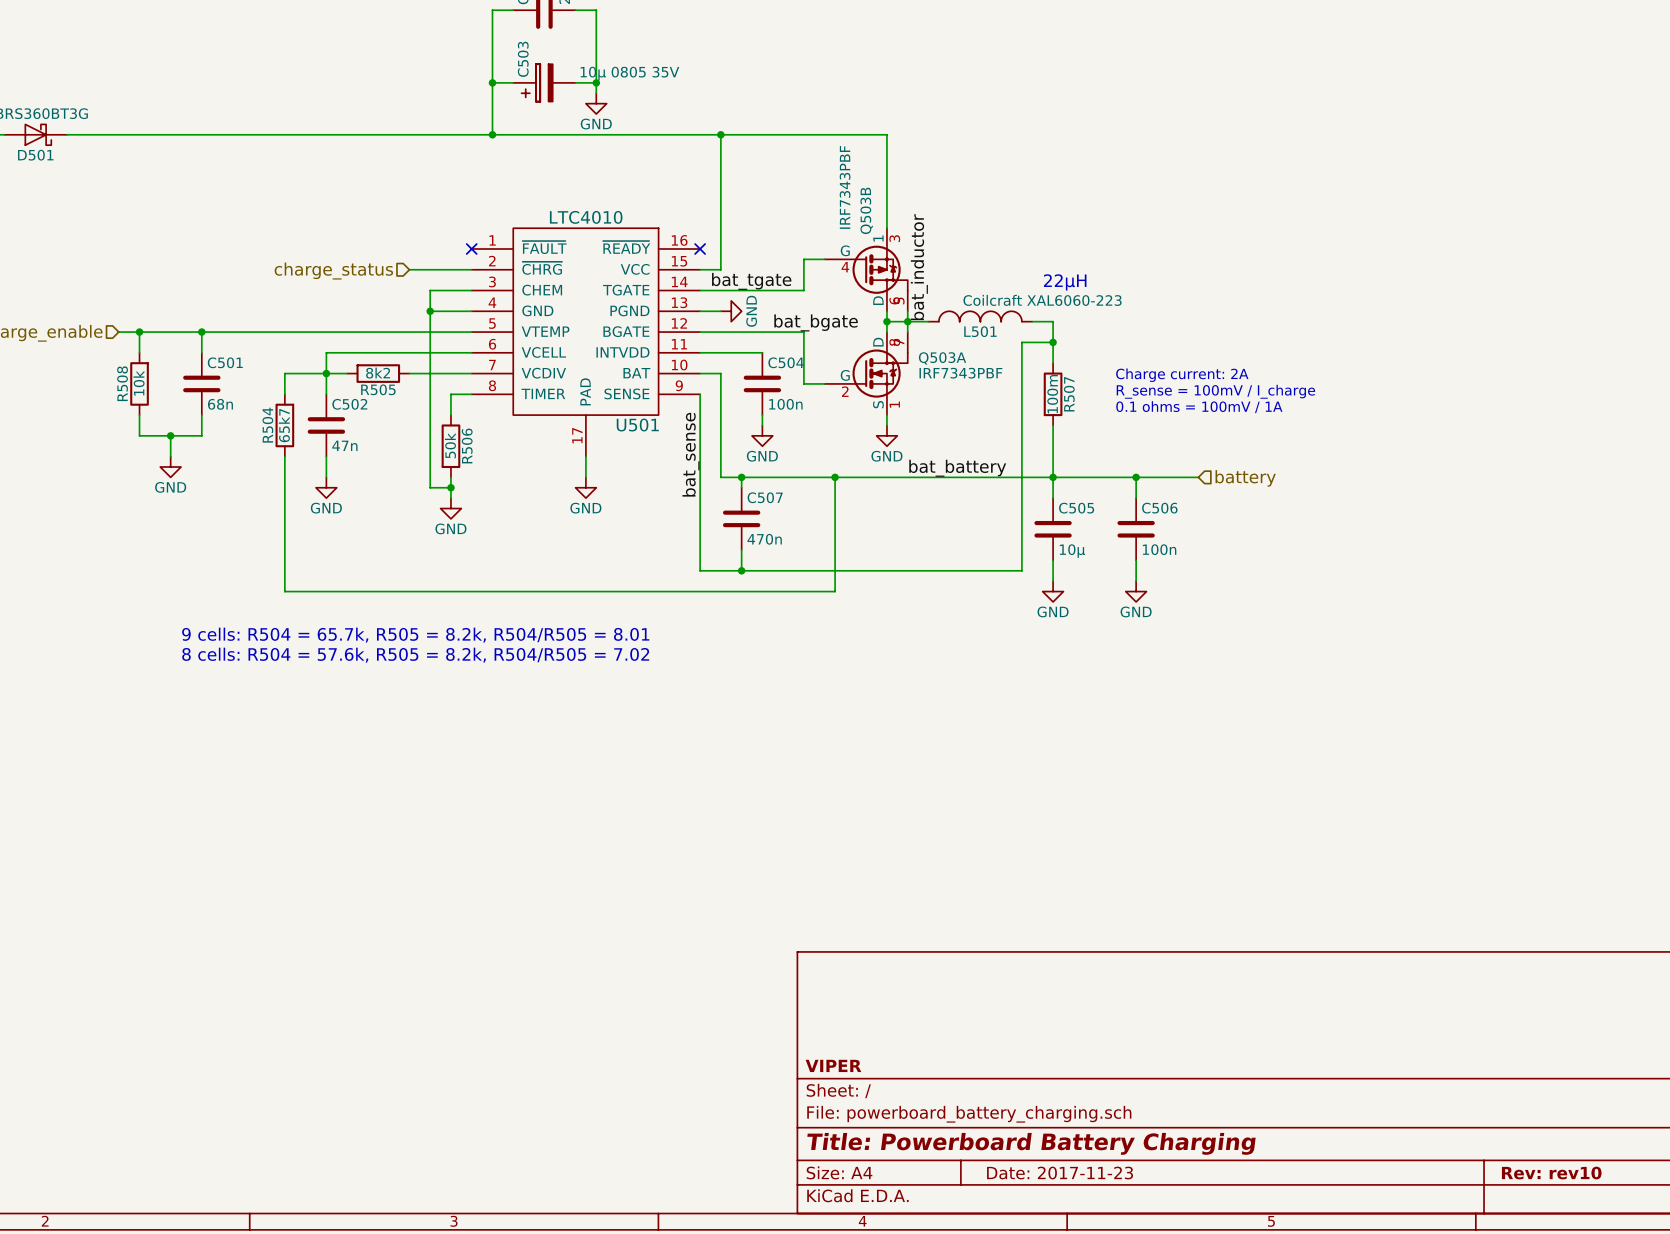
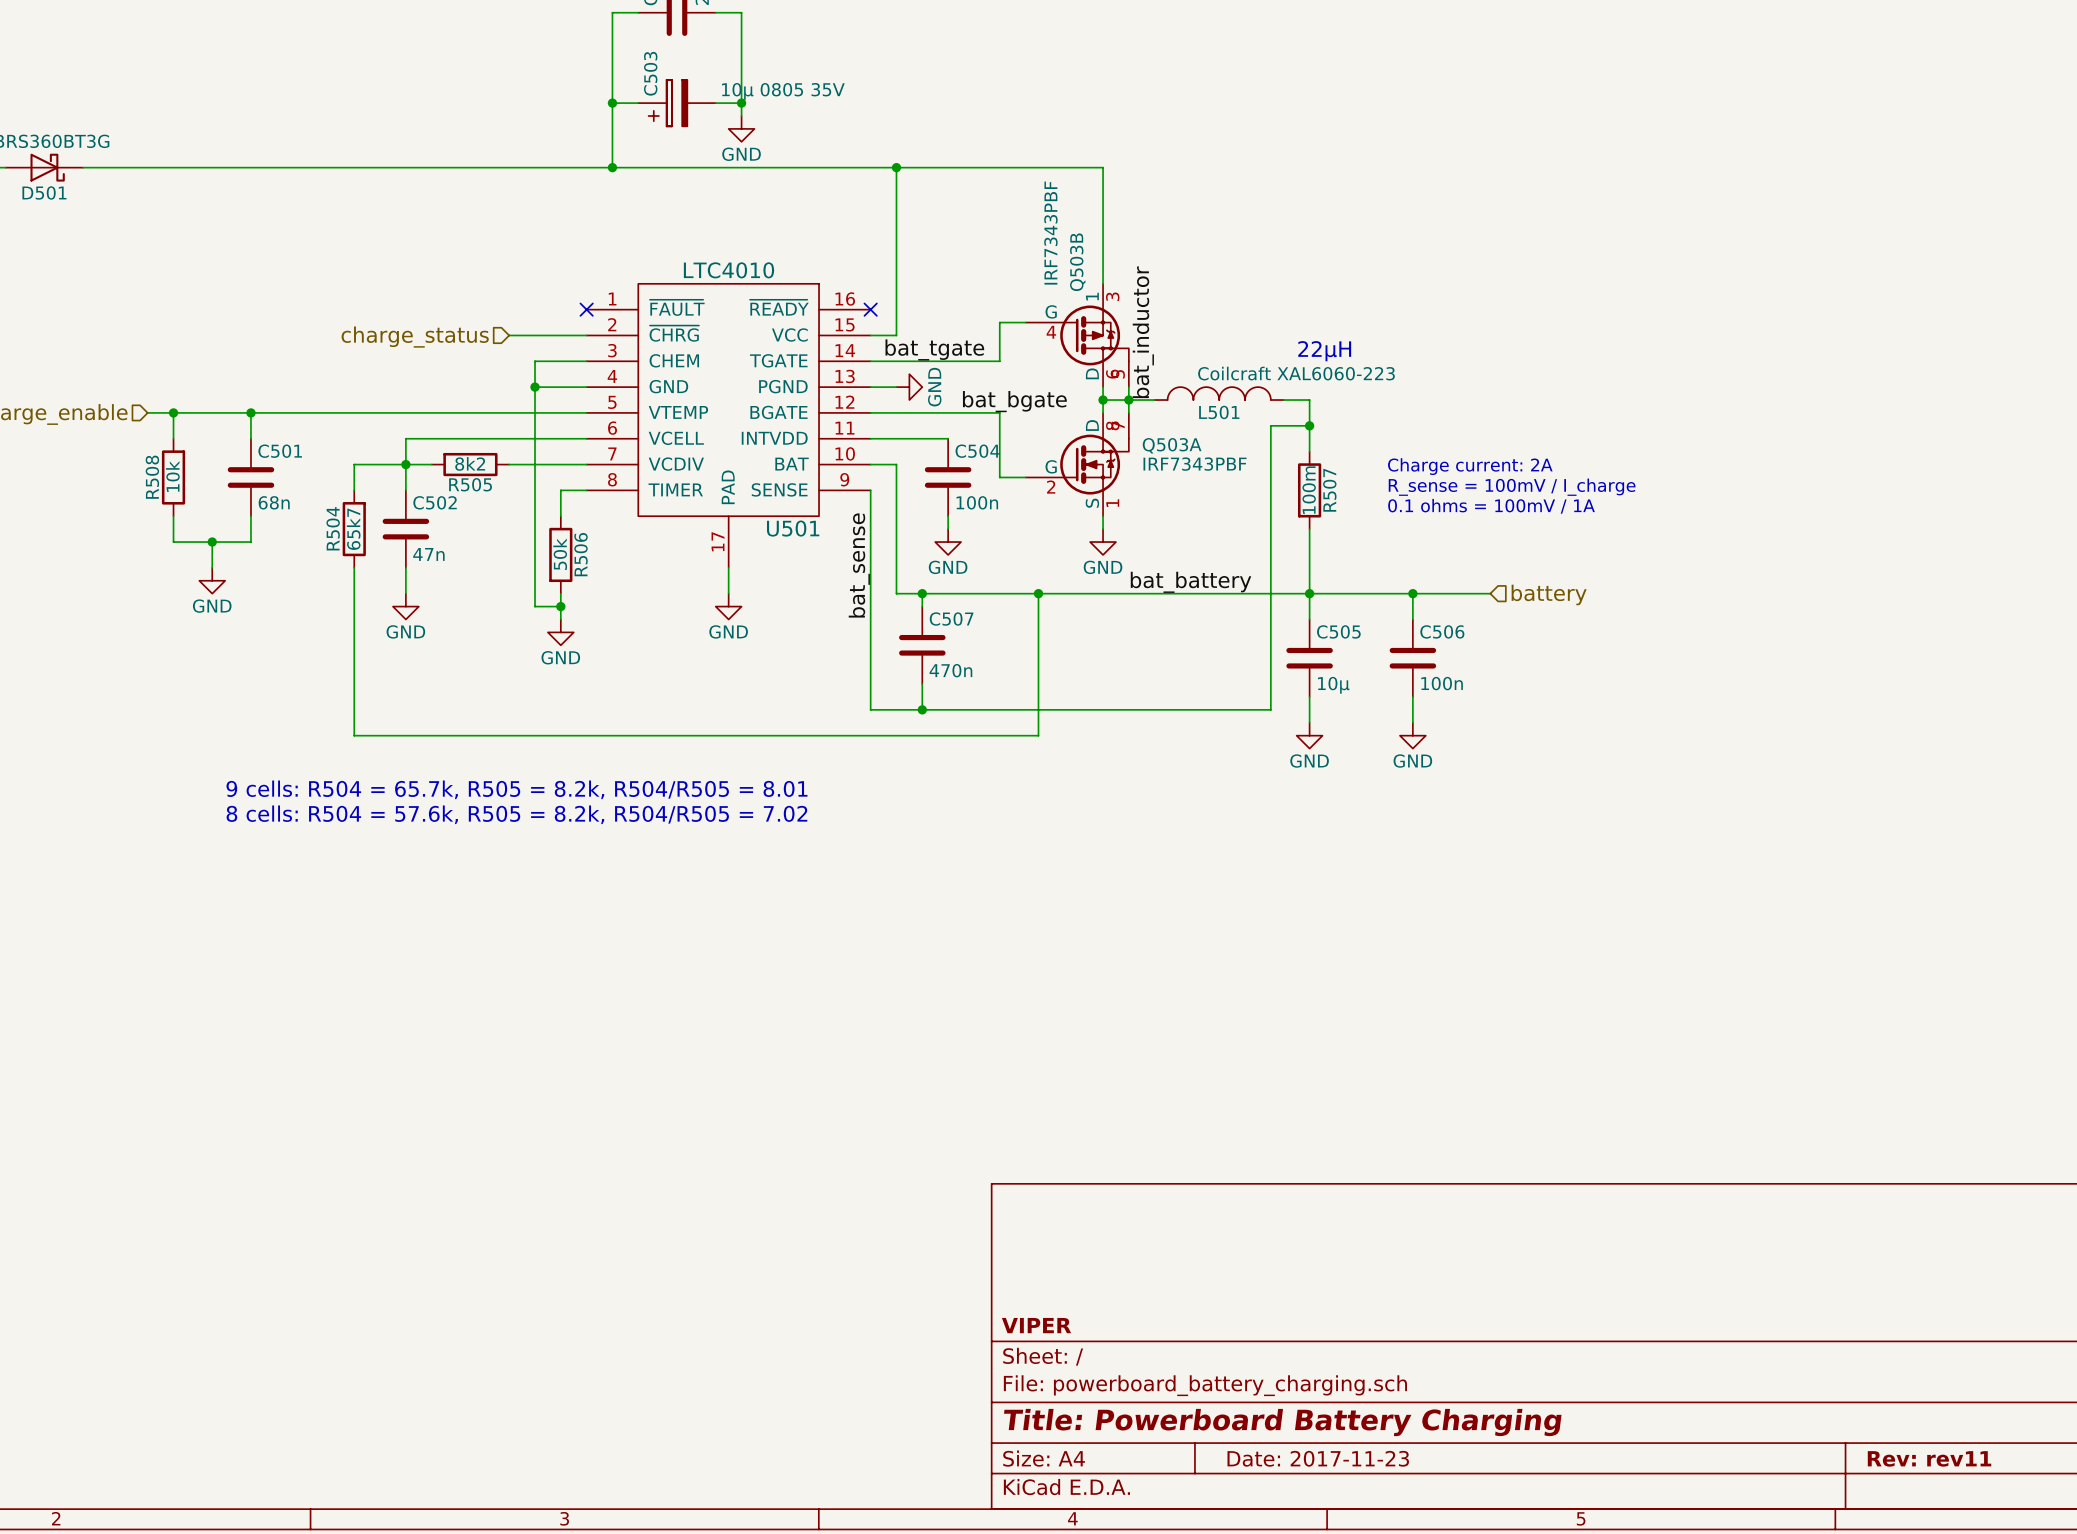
title block: Rev: rev10 (1551, 1173) -> Rev: rev11 (1929, 1458)

